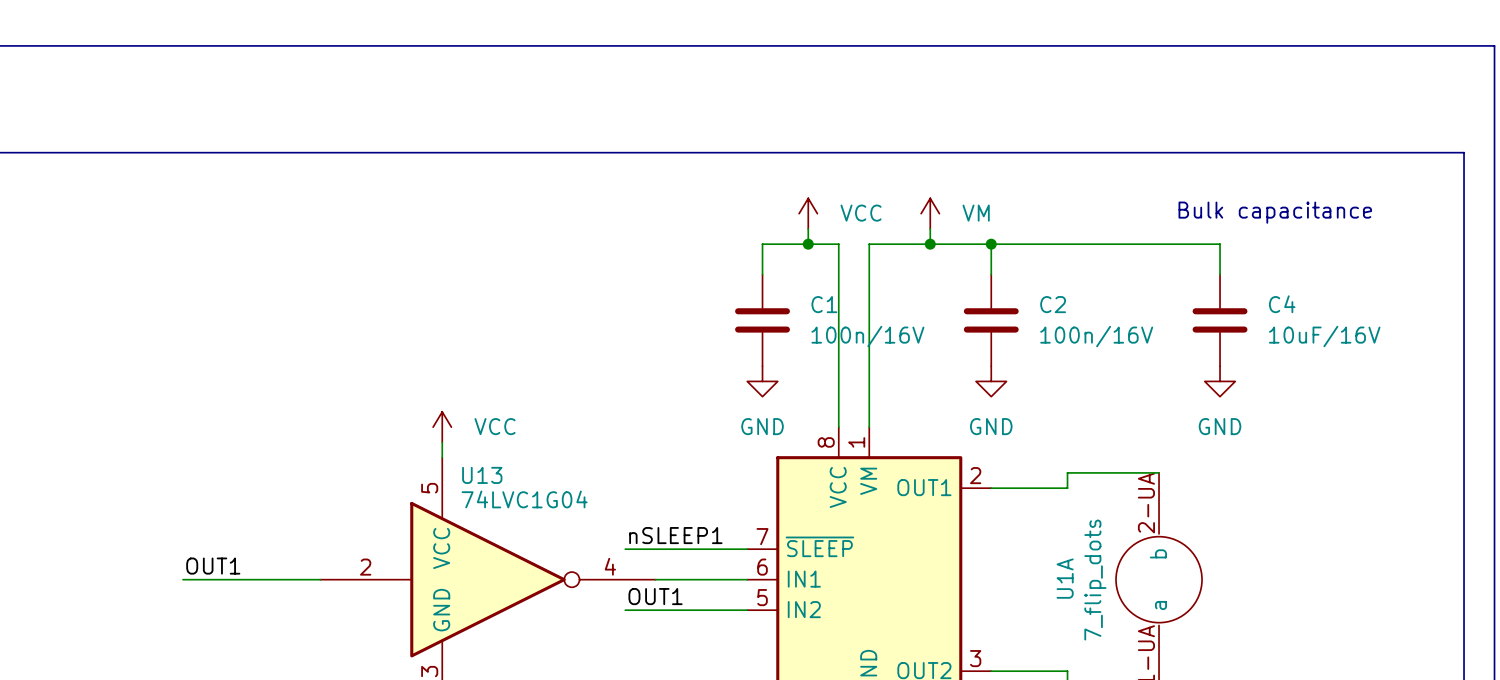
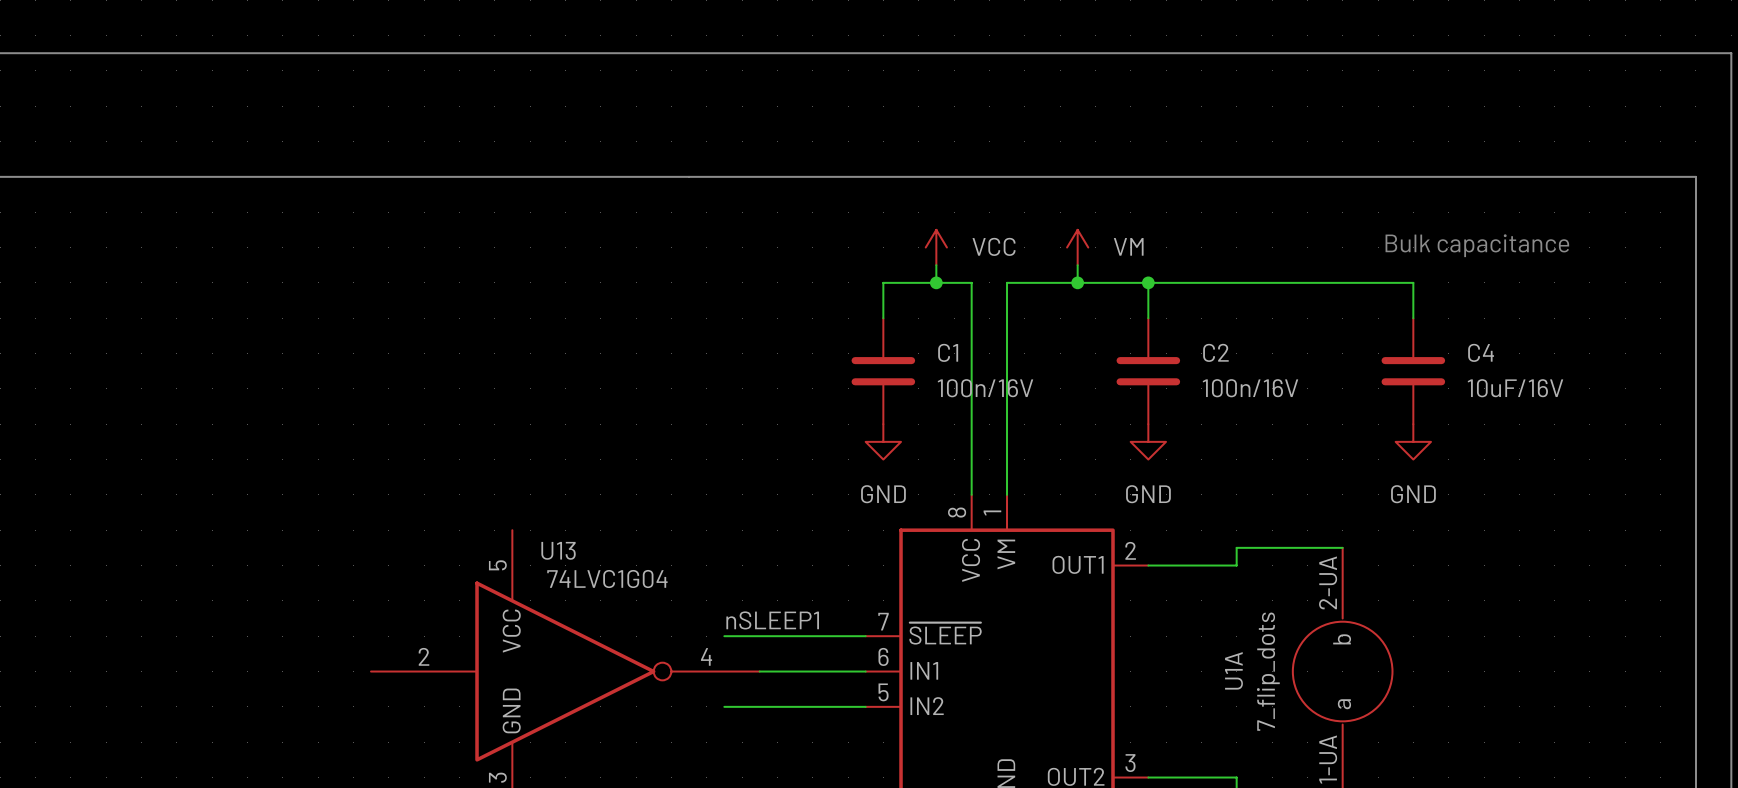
power symbol: VCC (442, 427) -> none
wire: (442, 442) (442, 457) -> none
label: OUT1 (213, 566) -> none
wire: (183, 579) (320, 579) -> none
label: OUT1 (655, 596) -> none

